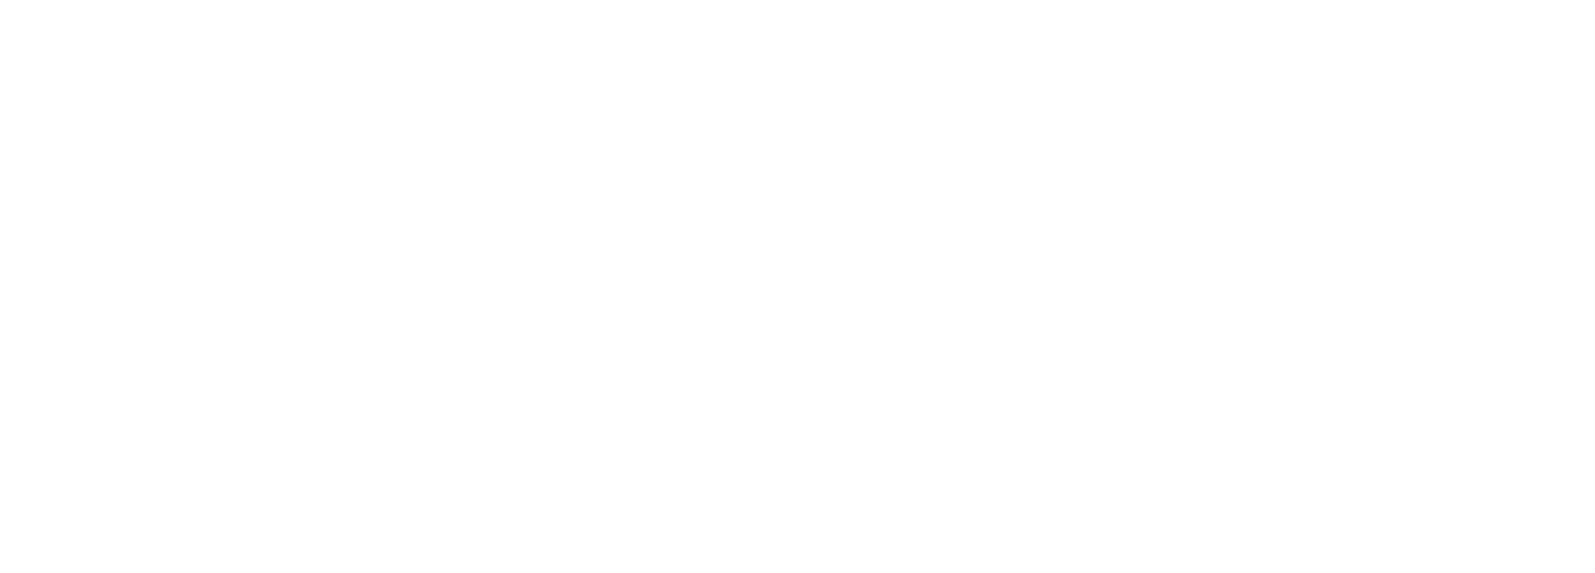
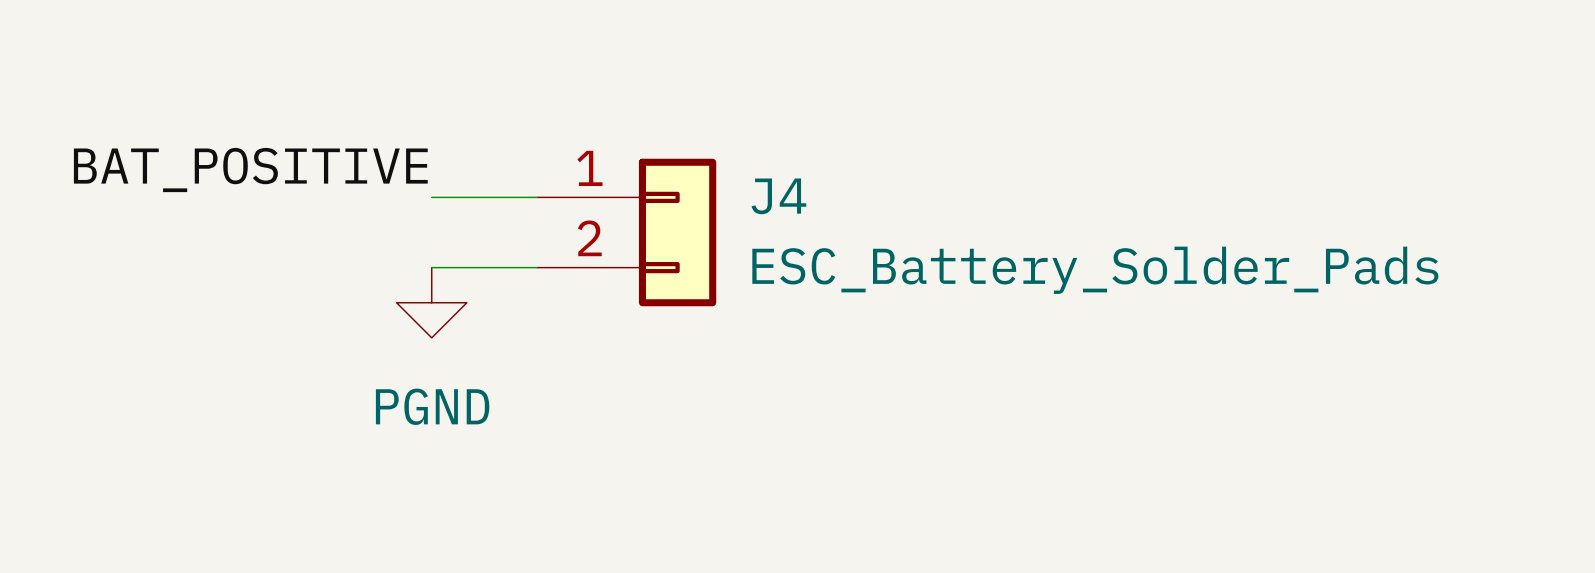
label: none -> BAT_POSITIVE (250, 170)
wire: none -> (431, 197) (537, 197)
J4: none -> ESC_Battery_Solder_Pads (626, 232)
wire: none -> (431, 267) (537, 267)
power symbol: none -> PGND (431, 302)

